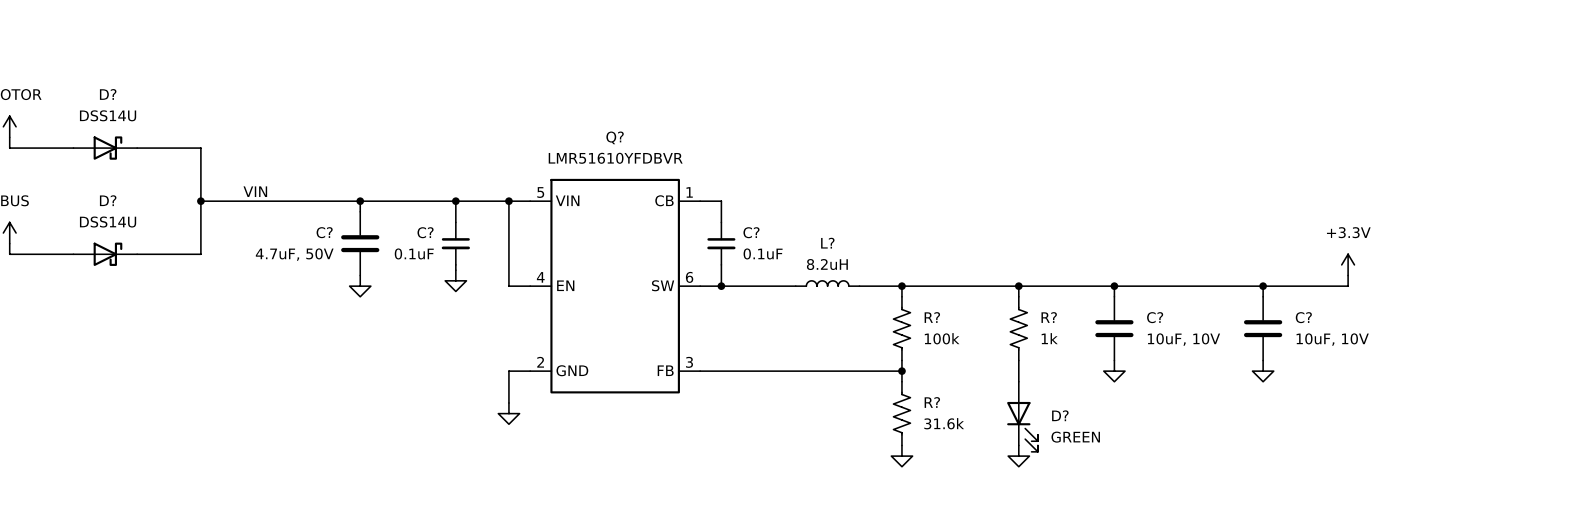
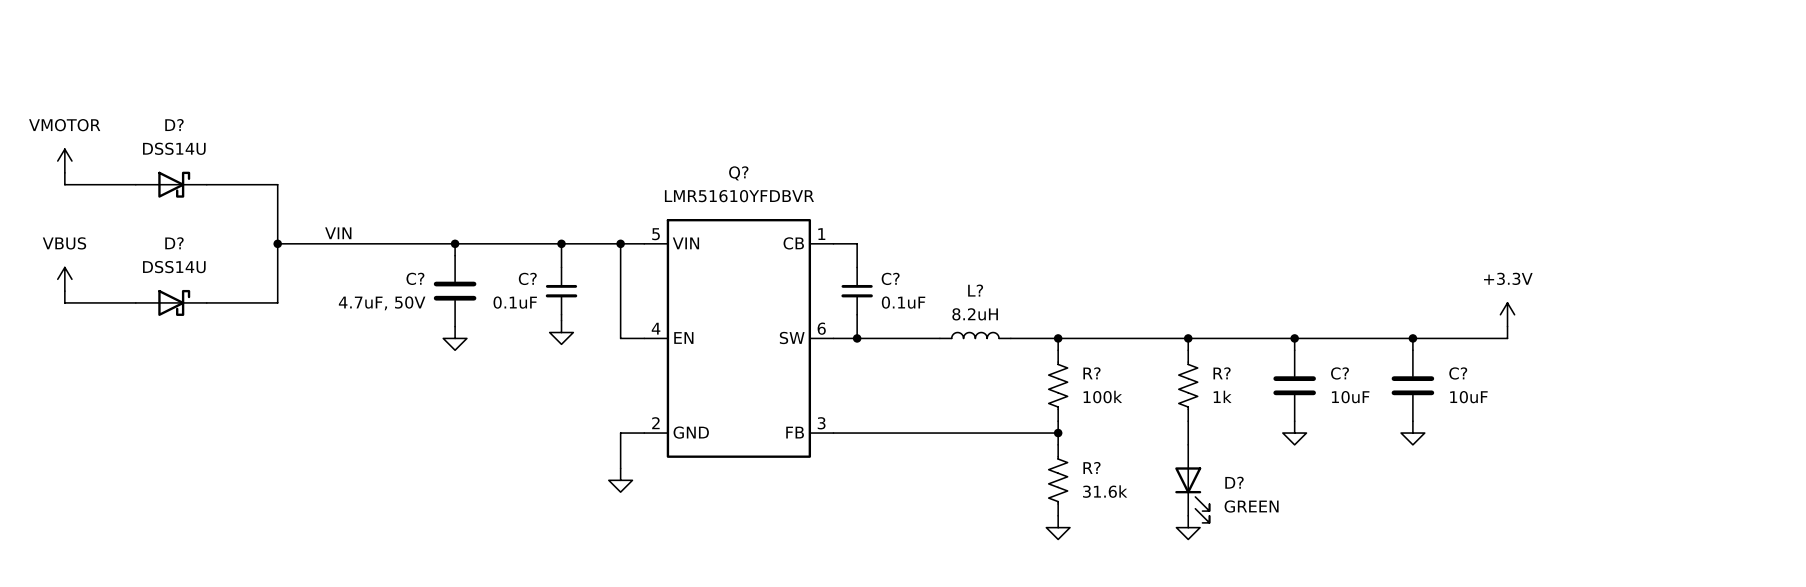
power symbol position: +3.3V (1348, 264) -> +3.3V (1507, 314)
wire: (1348, 275) (1348, 286) (1305, 286) -> (1507, 326) (1507, 338)
wire: (1263, 286) (1263, 296) -> (1412, 338) (1412, 350)
junction position: (1263, 286) -> (1412, 338)
C?: none -> 10uF (1412, 385)
C?: 10uF, 10V (1263, 328) -> none
C? value: 10uF, 10V (1183, 339) -> 10uF (1350, 397)
power symbol position: (1263, 371) -> (1412, 433)

